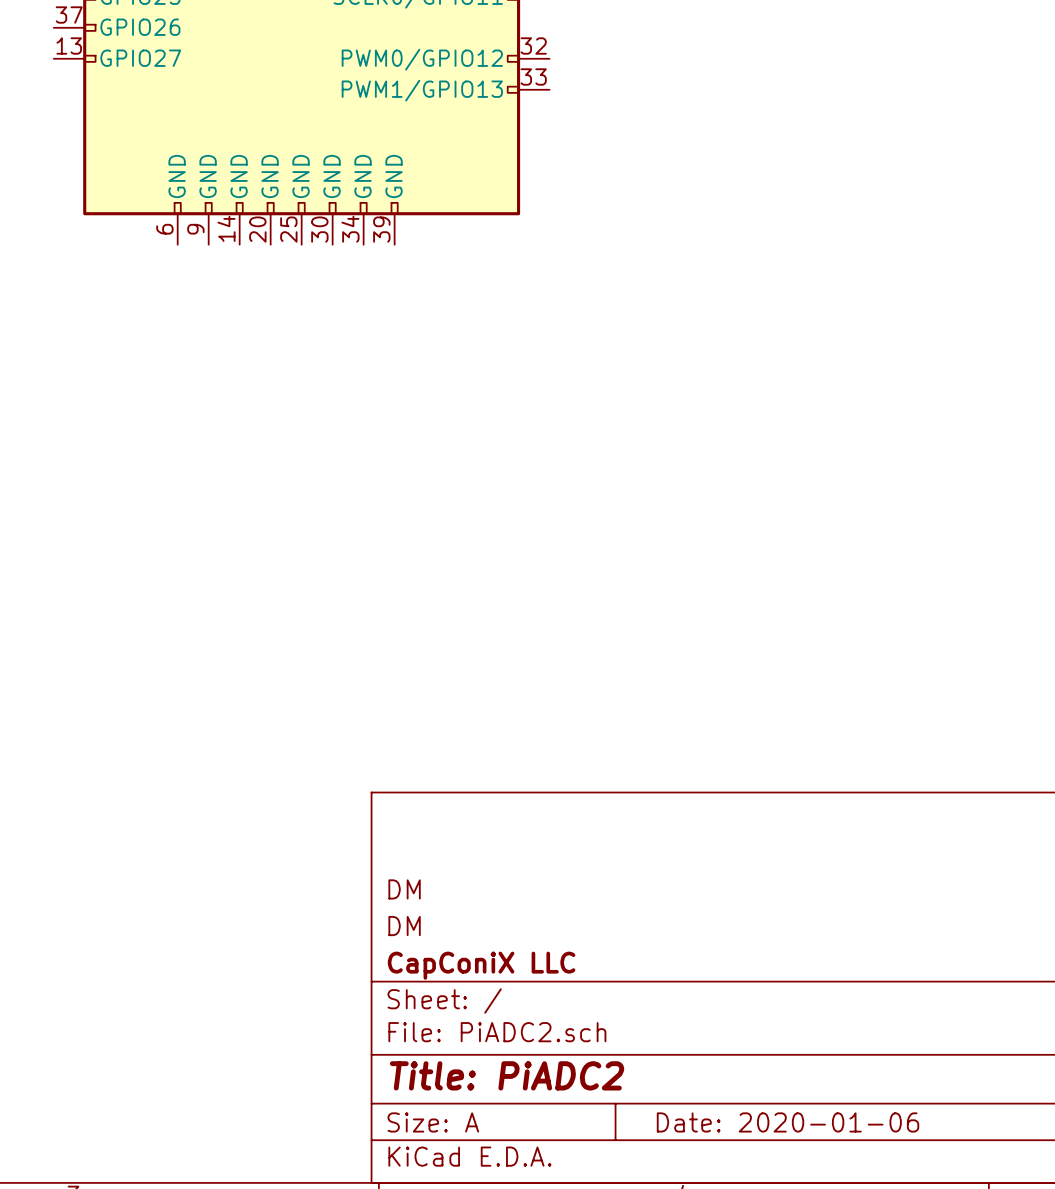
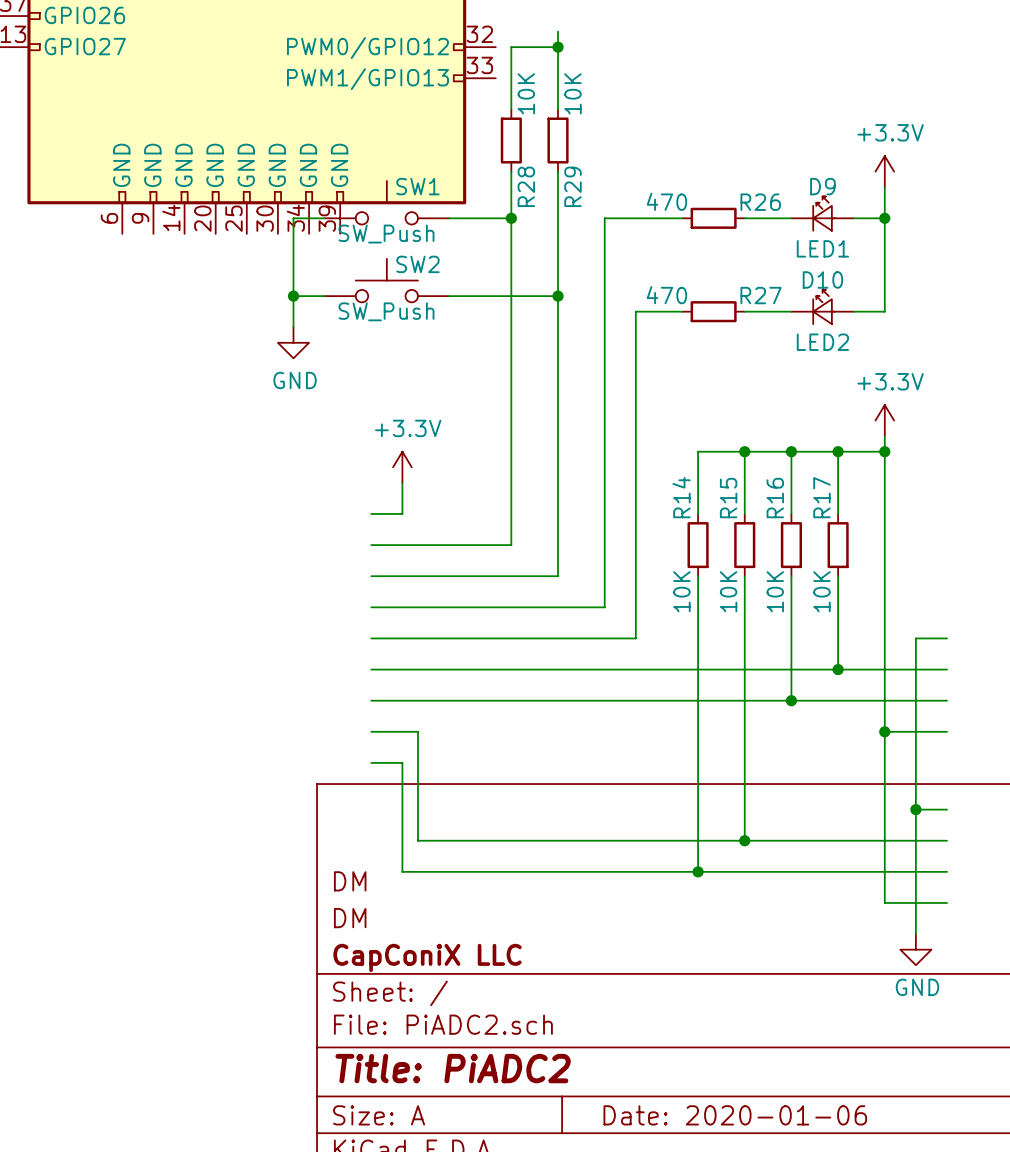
wire: none -> (558, 31) (558, 109)
wire: none -> (558, 47) (511, 47) (511, 109)
junction: none -> (558, 47)
R28: none -> 10K (511, 140)
R29: none -> 10K (558, 140)
wire: none -> (511, 171) (511, 545) (371, 545)
wire: none -> (558, 171) (558, 576) (371, 576)
power symbol: none -> +3.3V (884, 171)
wire: none -> (884, 187) (884, 311) (853, 311)
SW1: none -> SW_Push (386, 202)
D9: none -> LED1 (822, 213)
wire: none -> (324, 218) (293, 218) (293, 327)
wire: none -> (449, 218) (511, 218)
junction: none -> (511, 218)
wire: none -> (682, 218) (604, 218) (604, 607) (371, 607)
R26: none -> 470 (713, 218)
wire: none -> (744, 218) (791, 218)
wire: none -> (853, 218) (884, 218)
junction: none -> (884, 218)
SW2: none -> SW_Push (386, 280)
wire: none -> (293, 296) (324, 296)
junction: none -> (293, 296)
wire: none -> (449, 296) (558, 296)
junction: none -> (558, 296)
D10: none -> LED2 (822, 307)
wire: none -> (682, 311) (635, 311) (635, 638) (371, 638)
R27: none -> 470 (713, 311)
wire: none -> (744, 311) (791, 311)
power symbol: none -> GND (293, 342)
power symbol: none -> +3.3V (884, 420)
wire: none -> (884, 436) (884, 902) (947, 902)
wire: none -> (744, 451) (744, 513)
junction: none -> (744, 451)
wire: none -> (791, 451) (791, 513)
junction: none -> (791, 451)
wire: none -> (838, 451) (838, 513)
junction: none -> (838, 451)
wire: none -> (884, 451) (698, 451) (698, 513)
junction: none -> (884, 451)
power symbol: none -> +3.3V (402, 467)
wire: none -> (402, 482) (402, 513) (371, 513)
R14: none -> 10K (698, 545)
R15: none -> 10K (744, 545)
R16: none -> 10K (791, 545)
R17: none -> 10K (838, 545)
wire: none -> (698, 576) (698, 871)
wire: none -> (744, 576) (744, 840)
wire: none -> (791, 576) (791, 700)
wire: none -> (838, 576) (838, 669)
wire: none -> (947, 638) (915, 638) (915, 934)
wire: none -> (371, 669) (947, 669)
junction: none -> (838, 669)
wire: none -> (371, 700) (947, 700)
junction: none -> (791, 700)
wire: none -> (371, 731) (417, 731) (417, 840) (947, 840)
wire: none -> (884, 731) (947, 731)
junction: none -> (884, 731)
wire: none -> (371, 762) (402, 762) (402, 871) (947, 871)
wire: none -> (915, 809) (947, 809)
junction: none -> (915, 809)
junction: none -> (744, 840)
junction: none -> (698, 871)
power symbol: none -> GND (915, 949)

